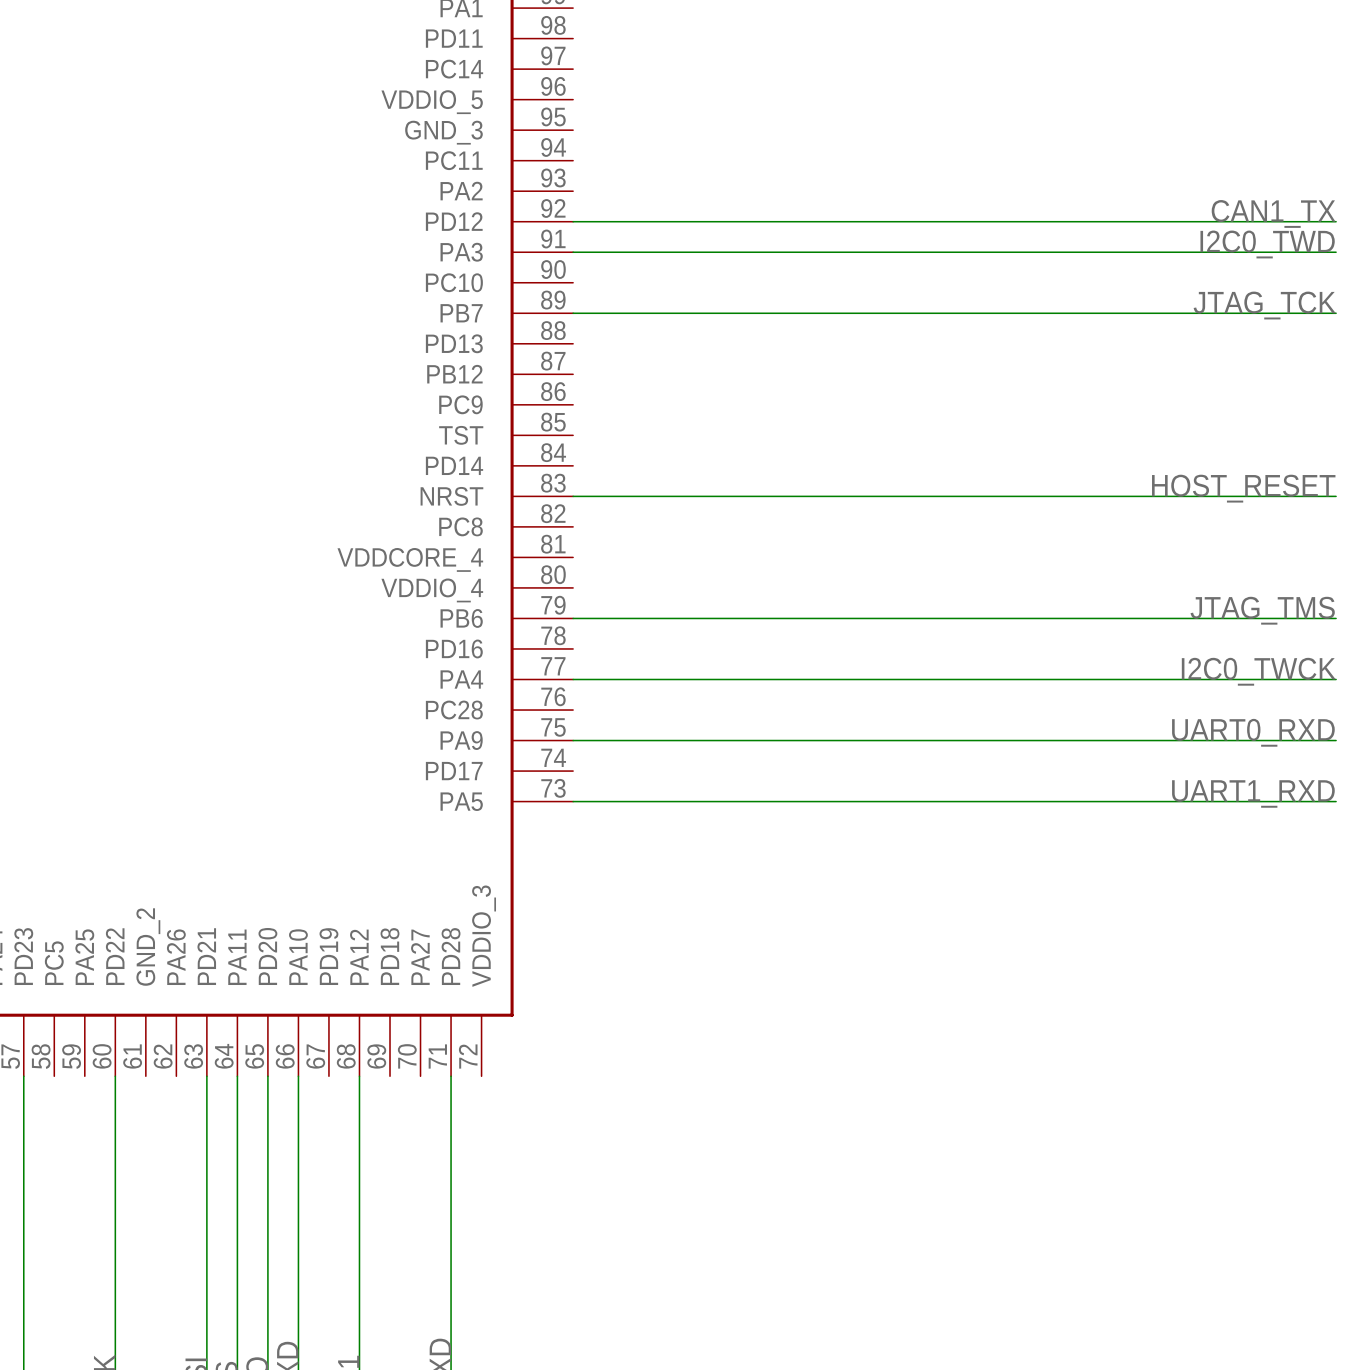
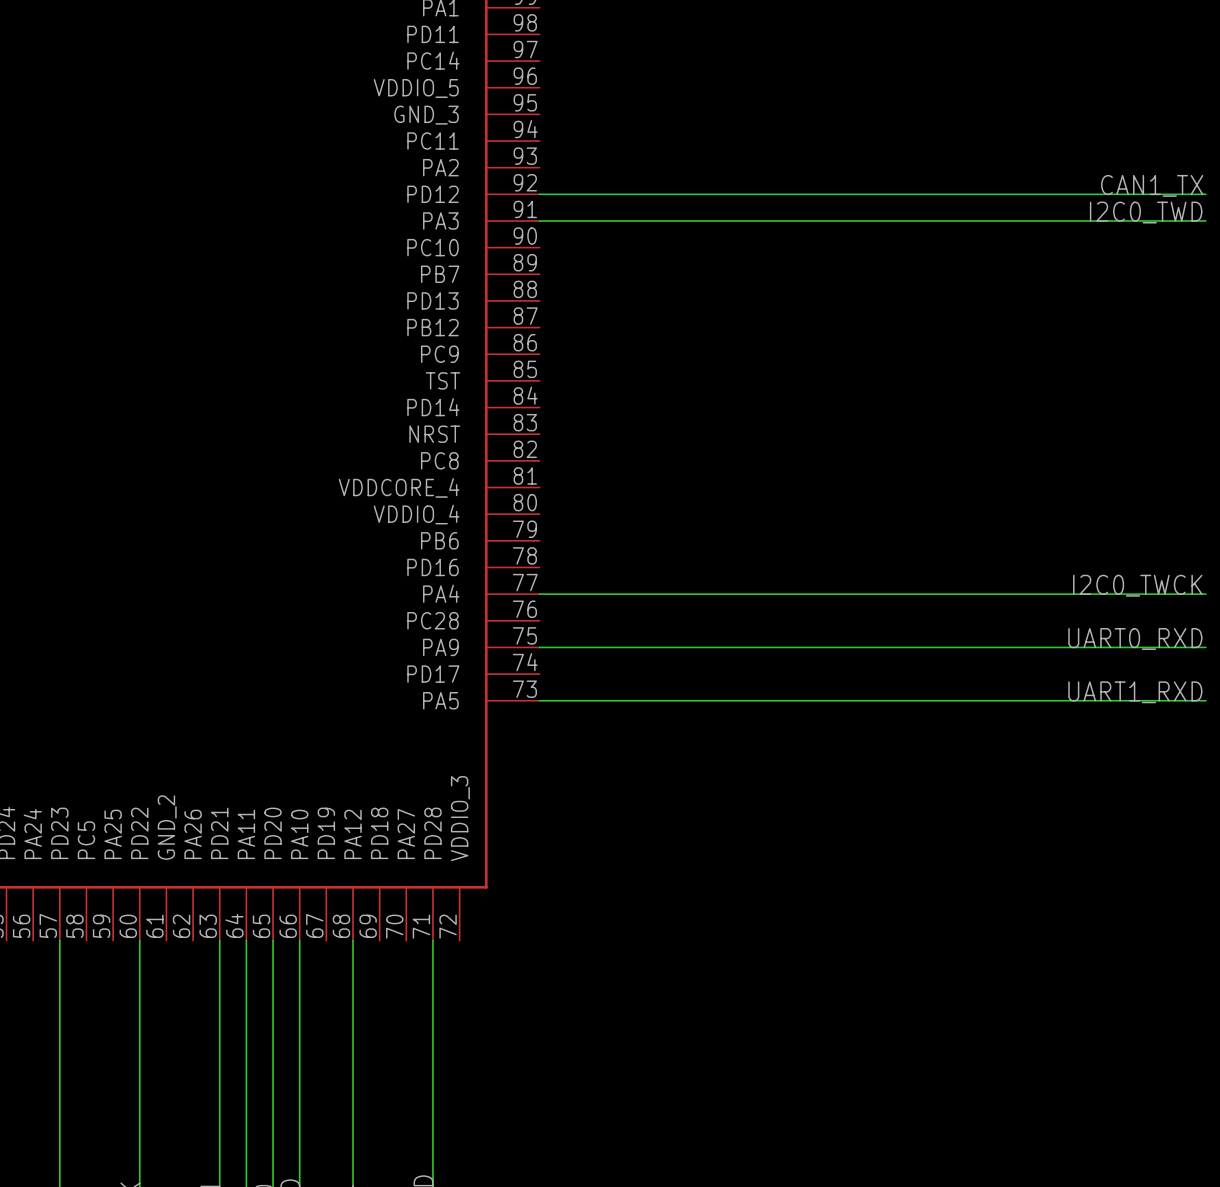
label: JTAG_TCK (1264, 305) -> none
wire: (573, 313) (1336, 313) -> none
label: HOST_RESET (1243, 488) -> none
wire: (573, 496) (1336, 496) -> none
label: JTAG_TMS (1262, 610) -> none
wire: (573, 618) (1336, 618) -> none

